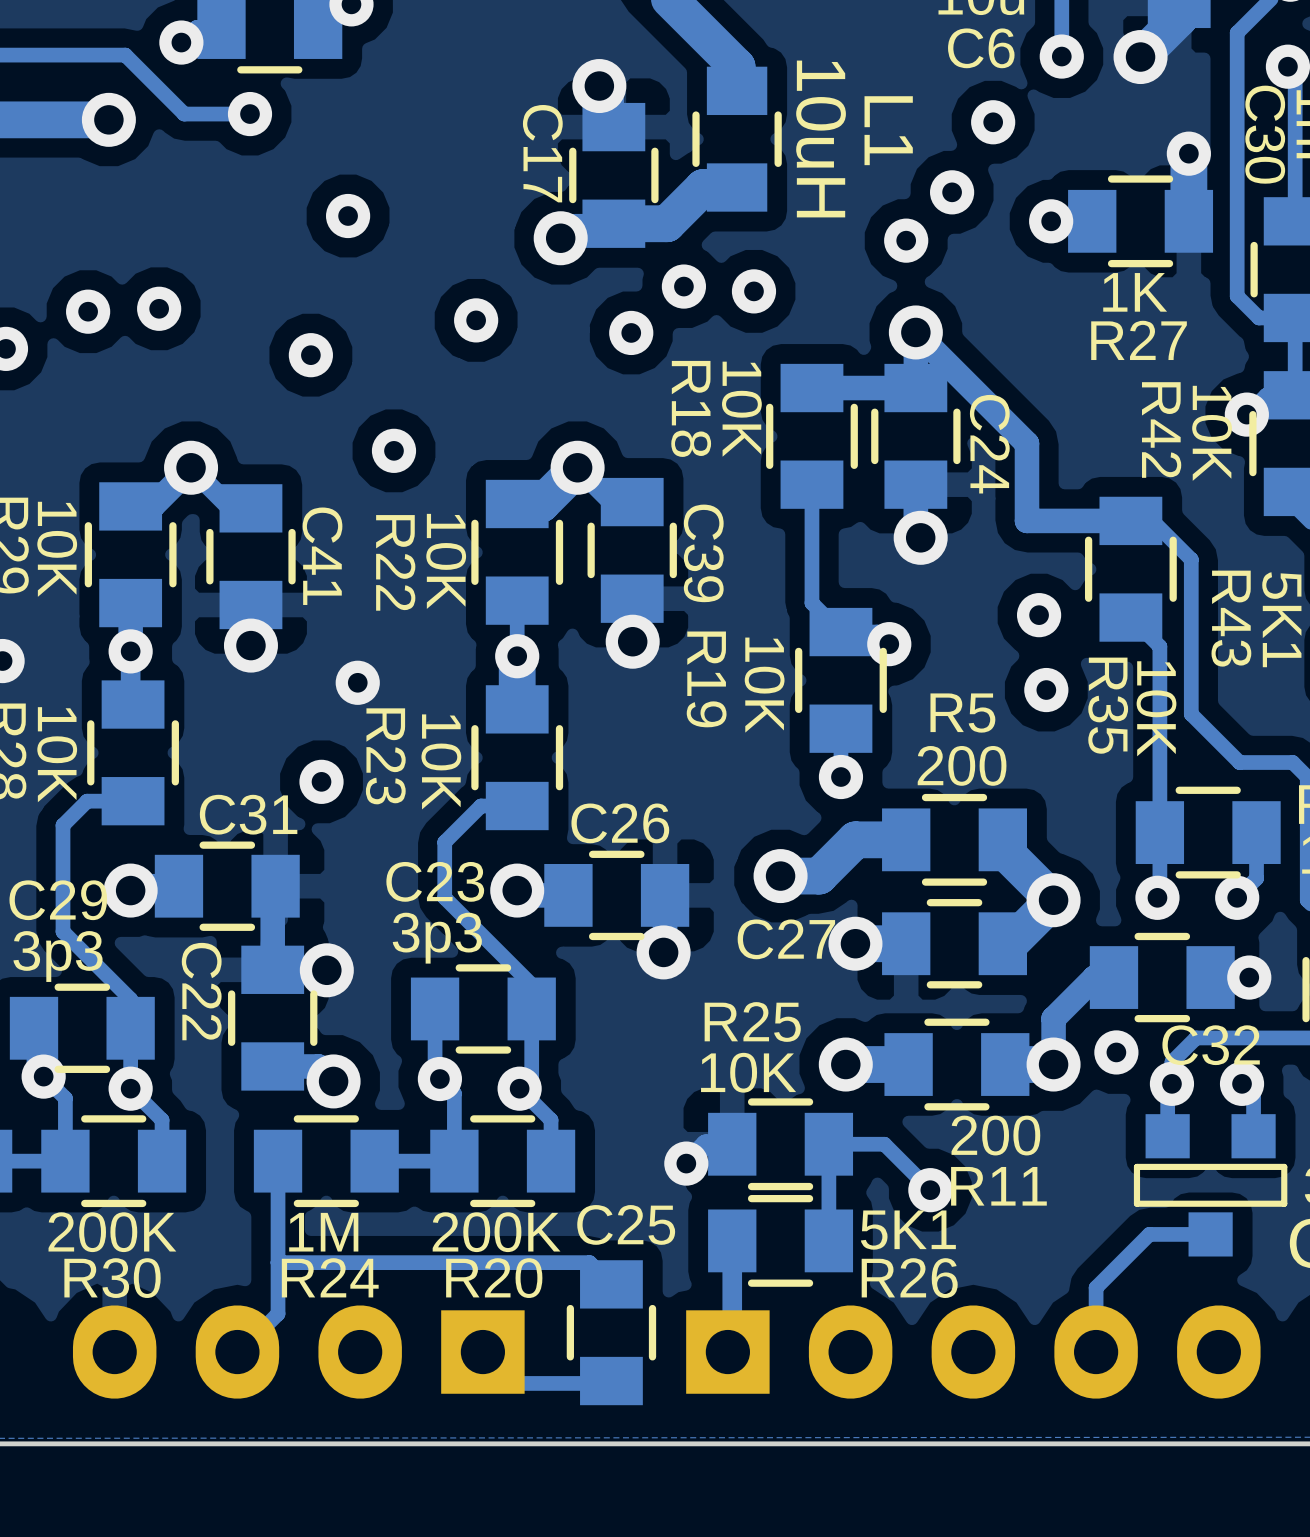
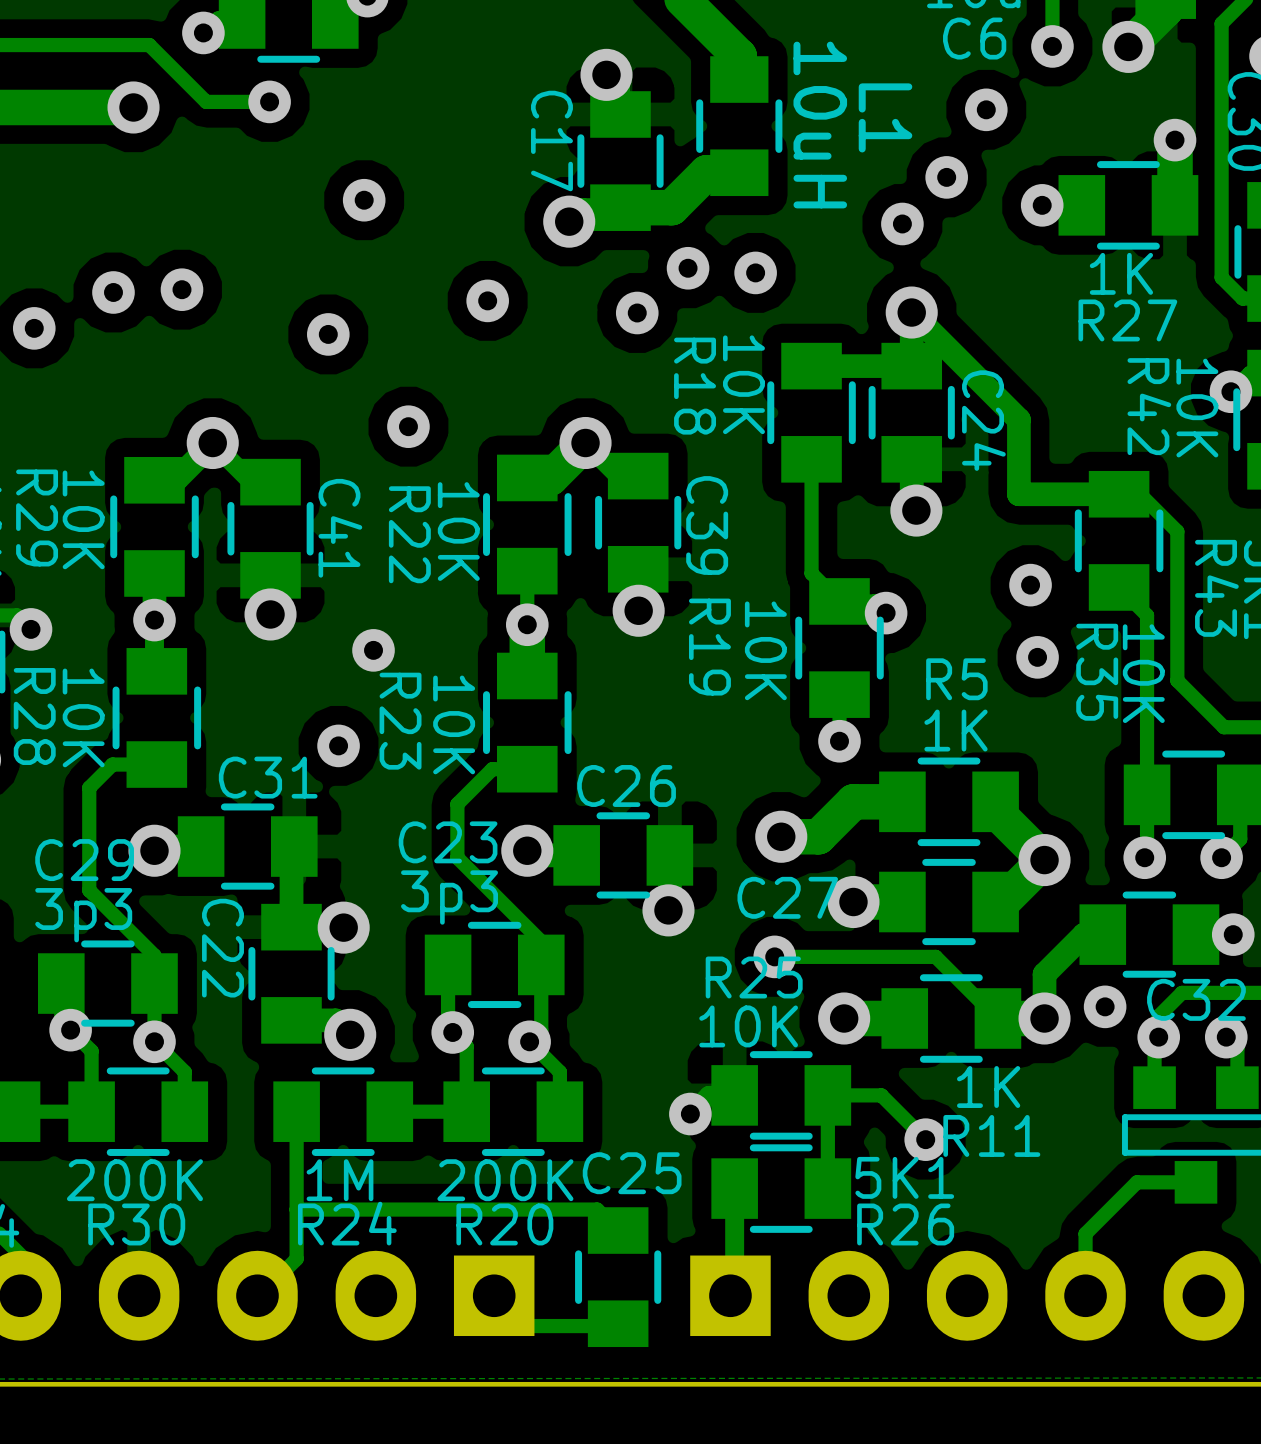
R5 value: 200 (962, 765) -> 1K (956, 730)
track: none -> (774, 956) (935, 956) (997, 1018)
via: none -> (774, 956)
R11 value: 200 (995, 1135) -> 1K (988, 1087)

